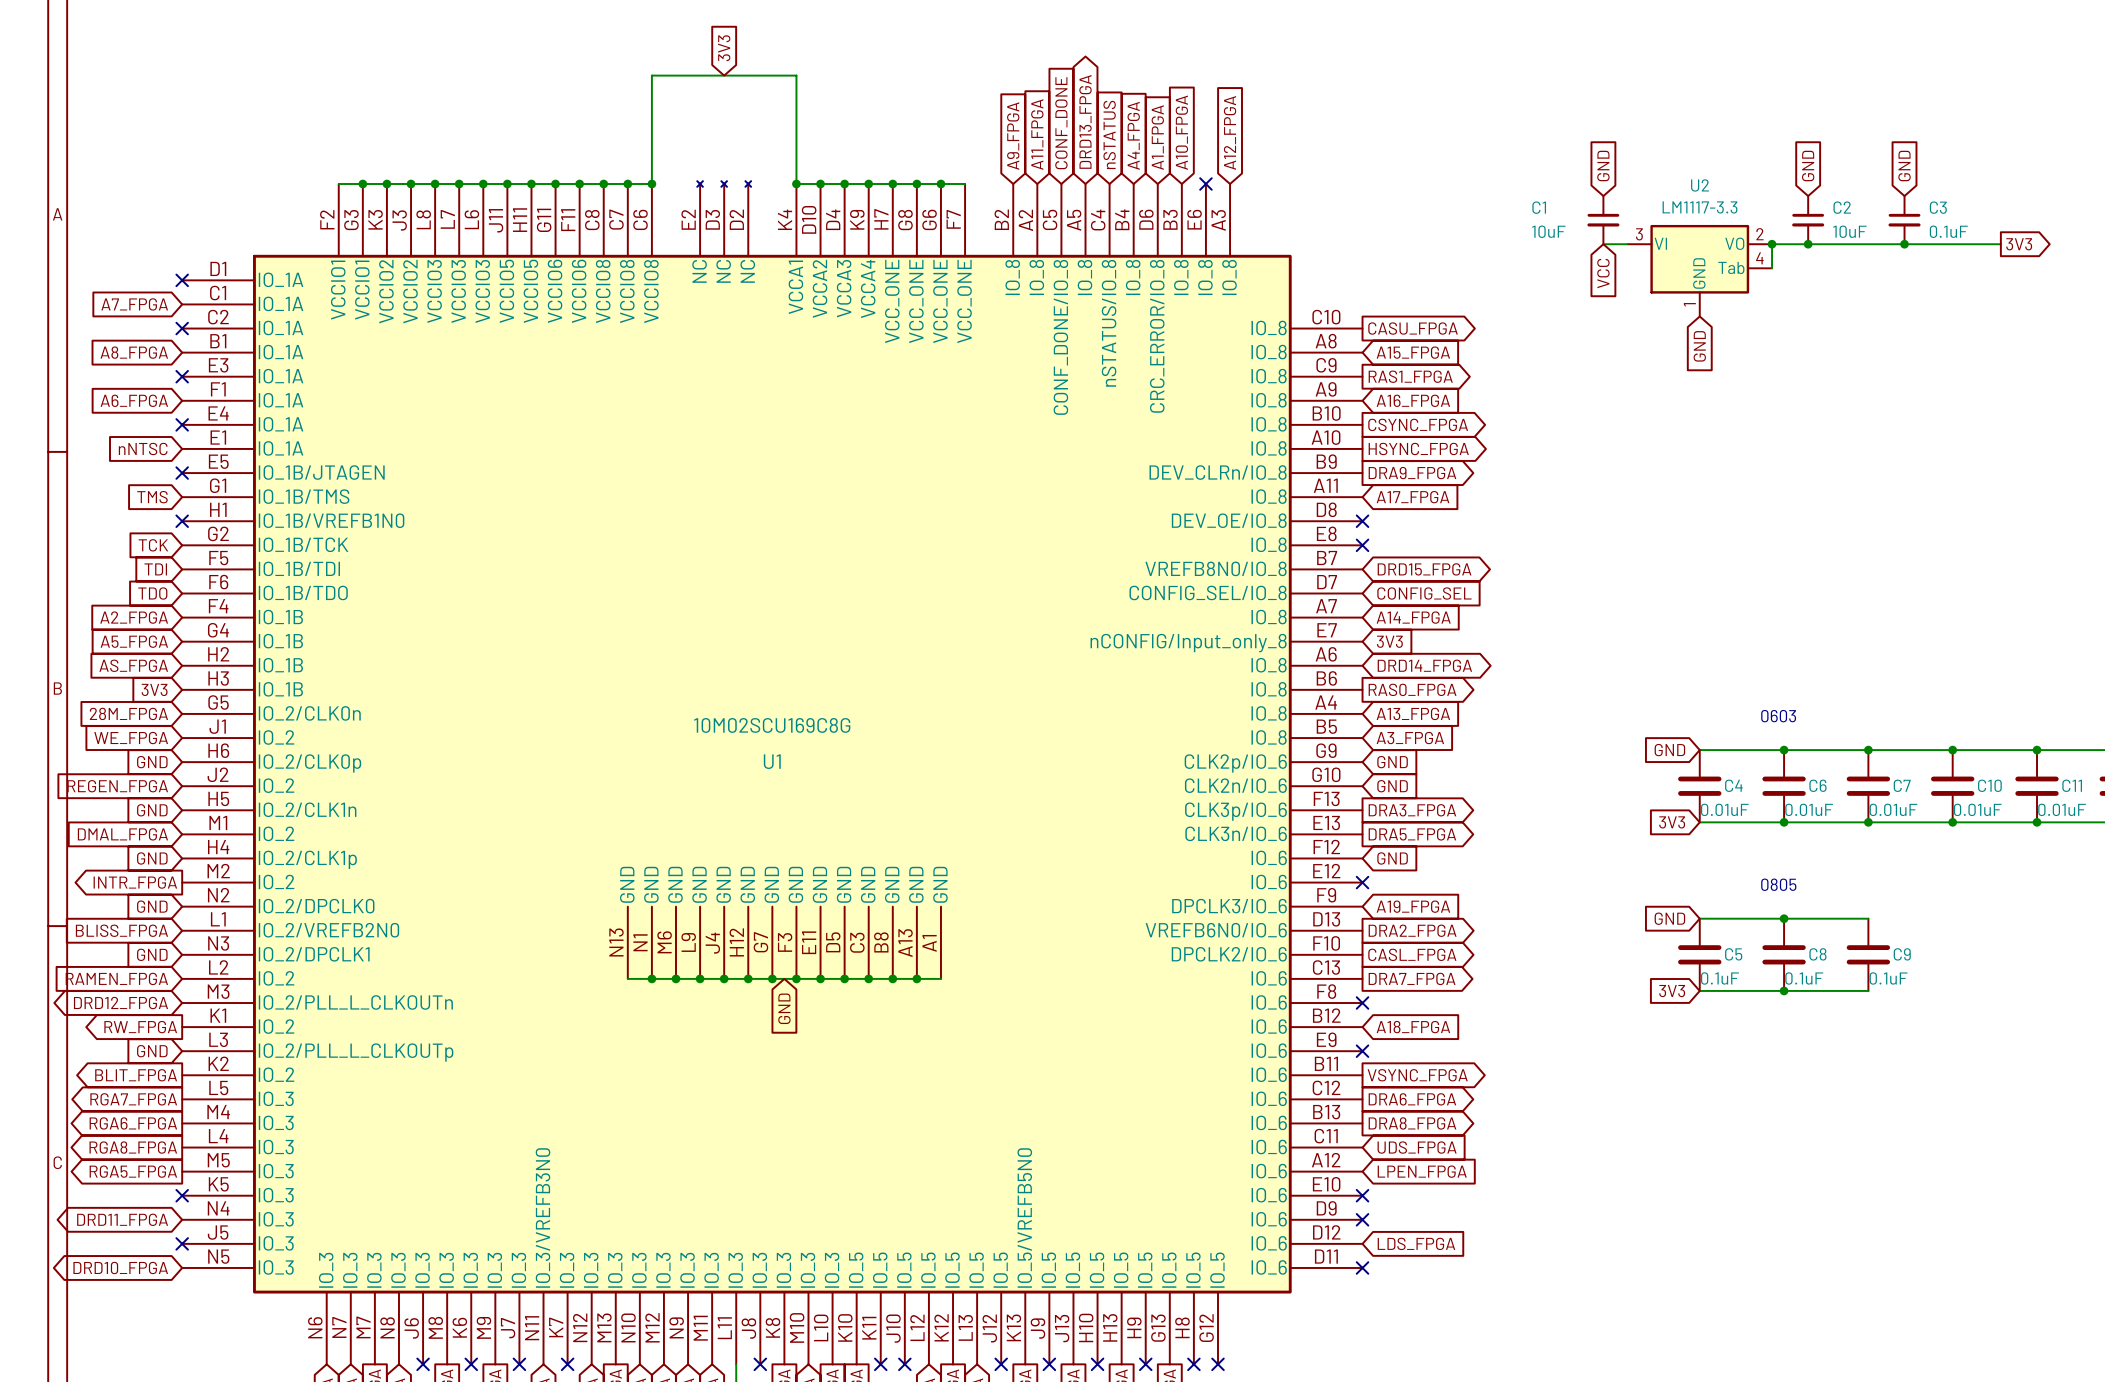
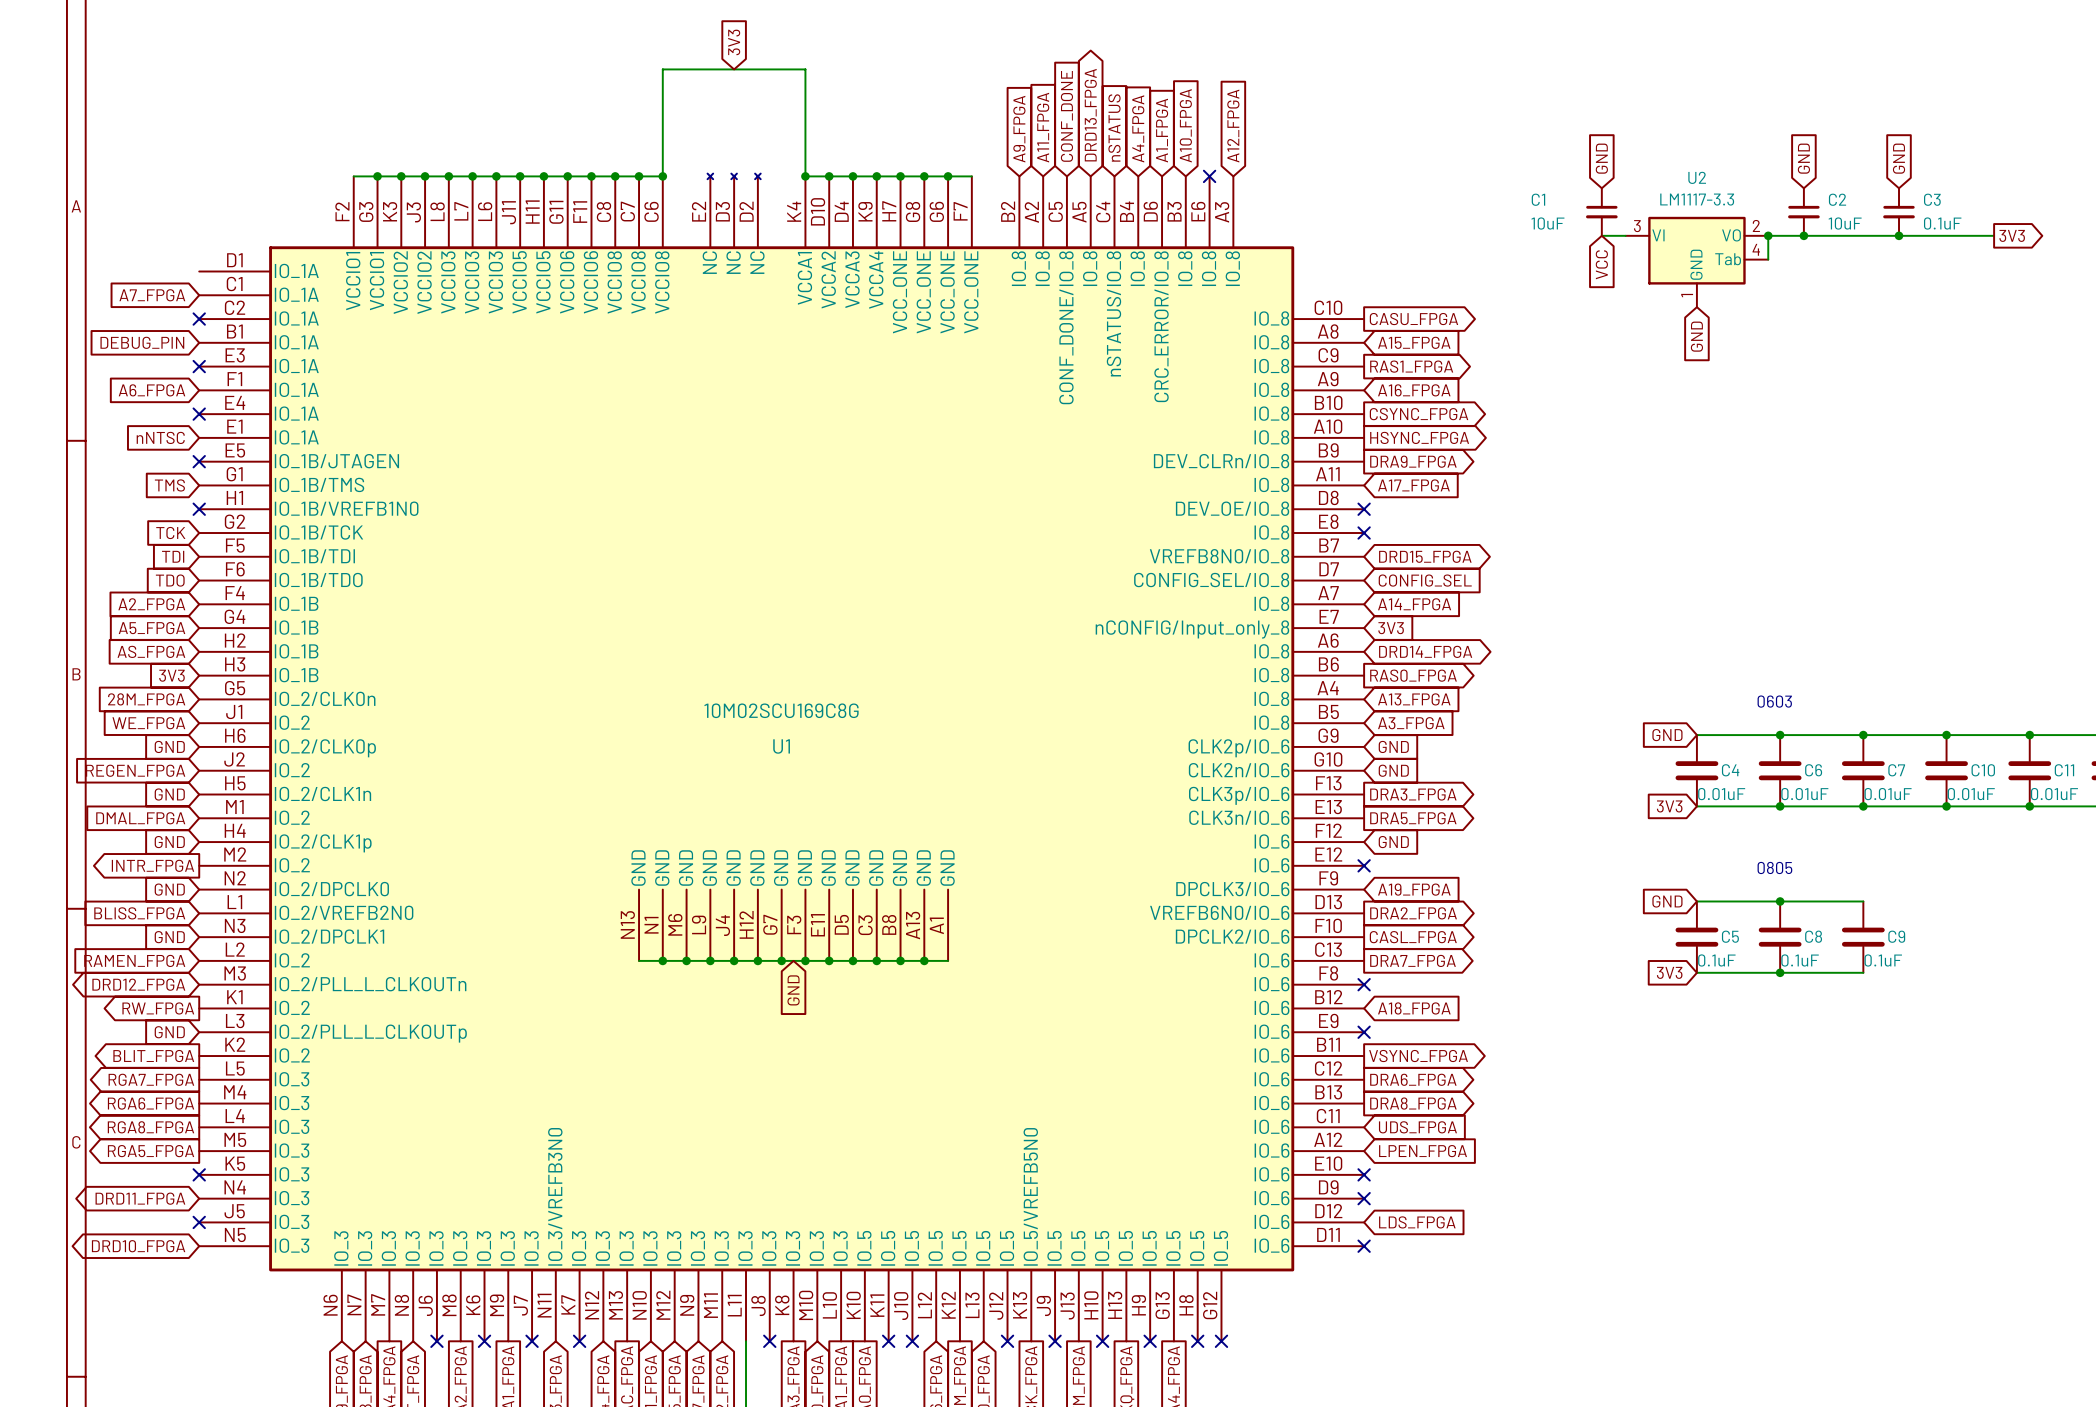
no-connect mark: (182, 280) -> none
global label: A8_FPGA (134, 352) -> DEBUG_PIN (142, 342)

